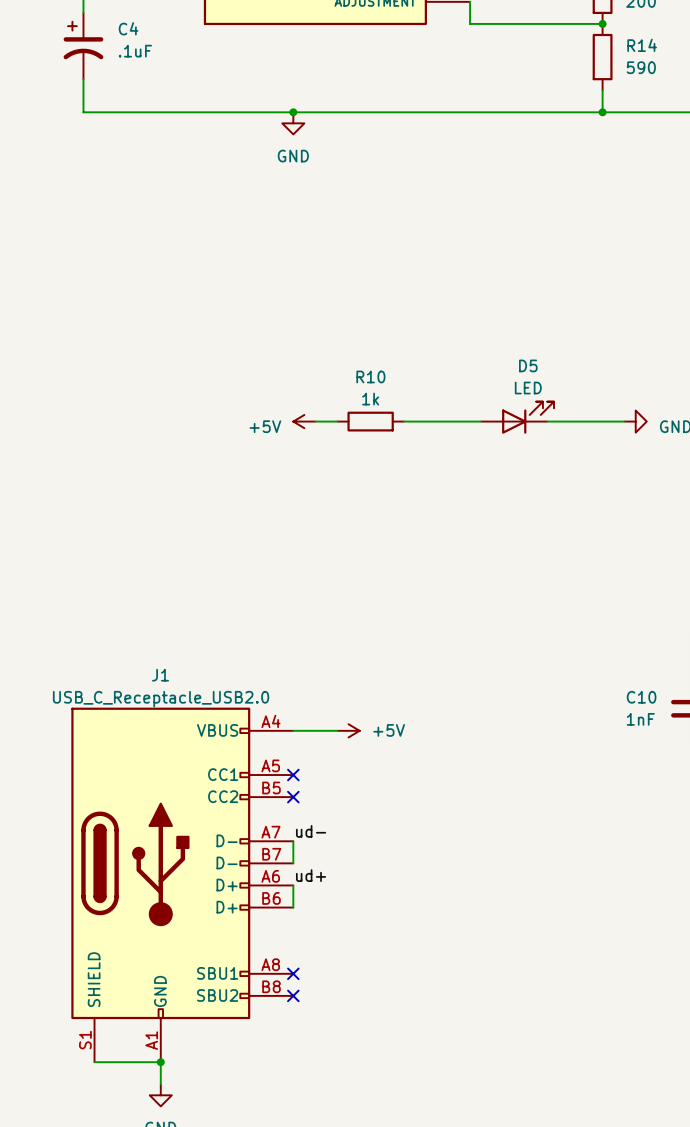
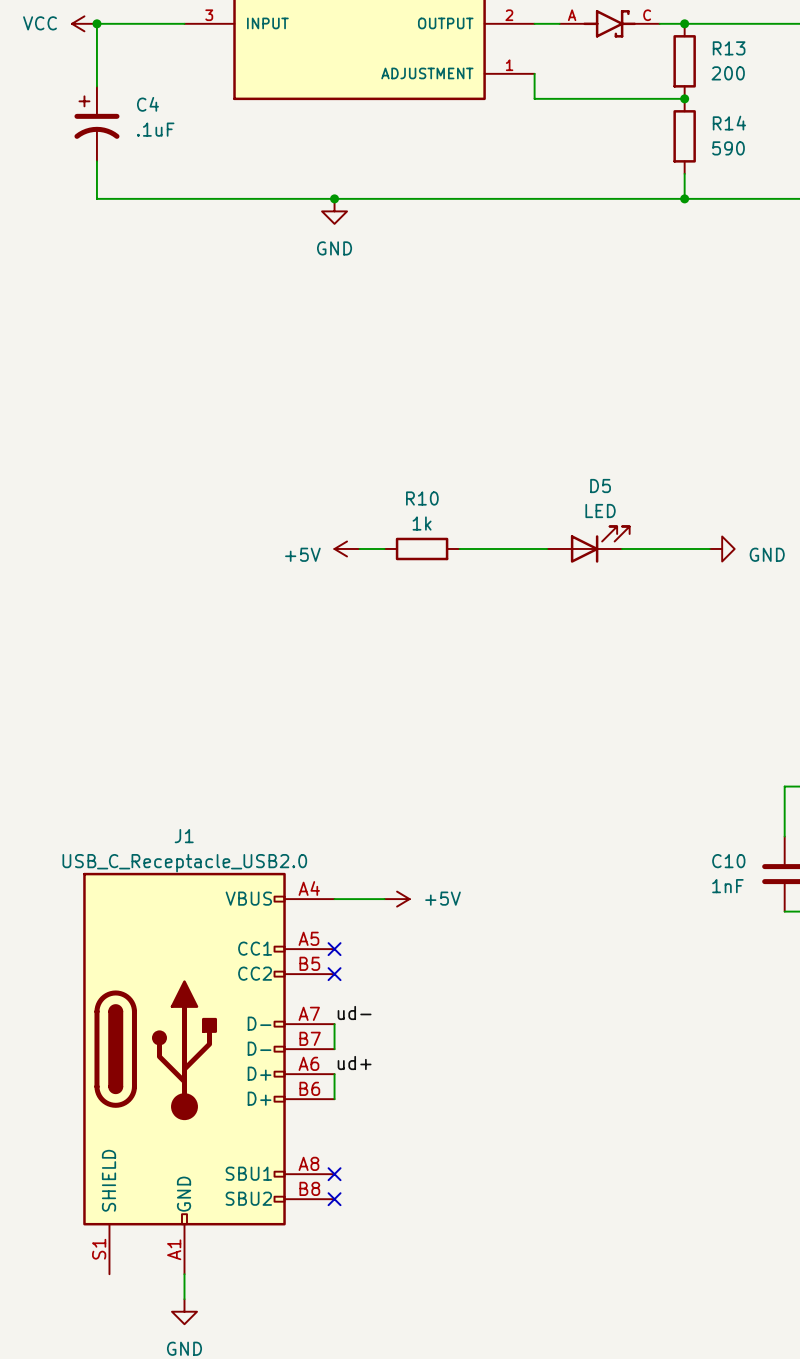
wire: (94, 1062) (160, 1062) -> none
junction: (160, 1062) -> none

